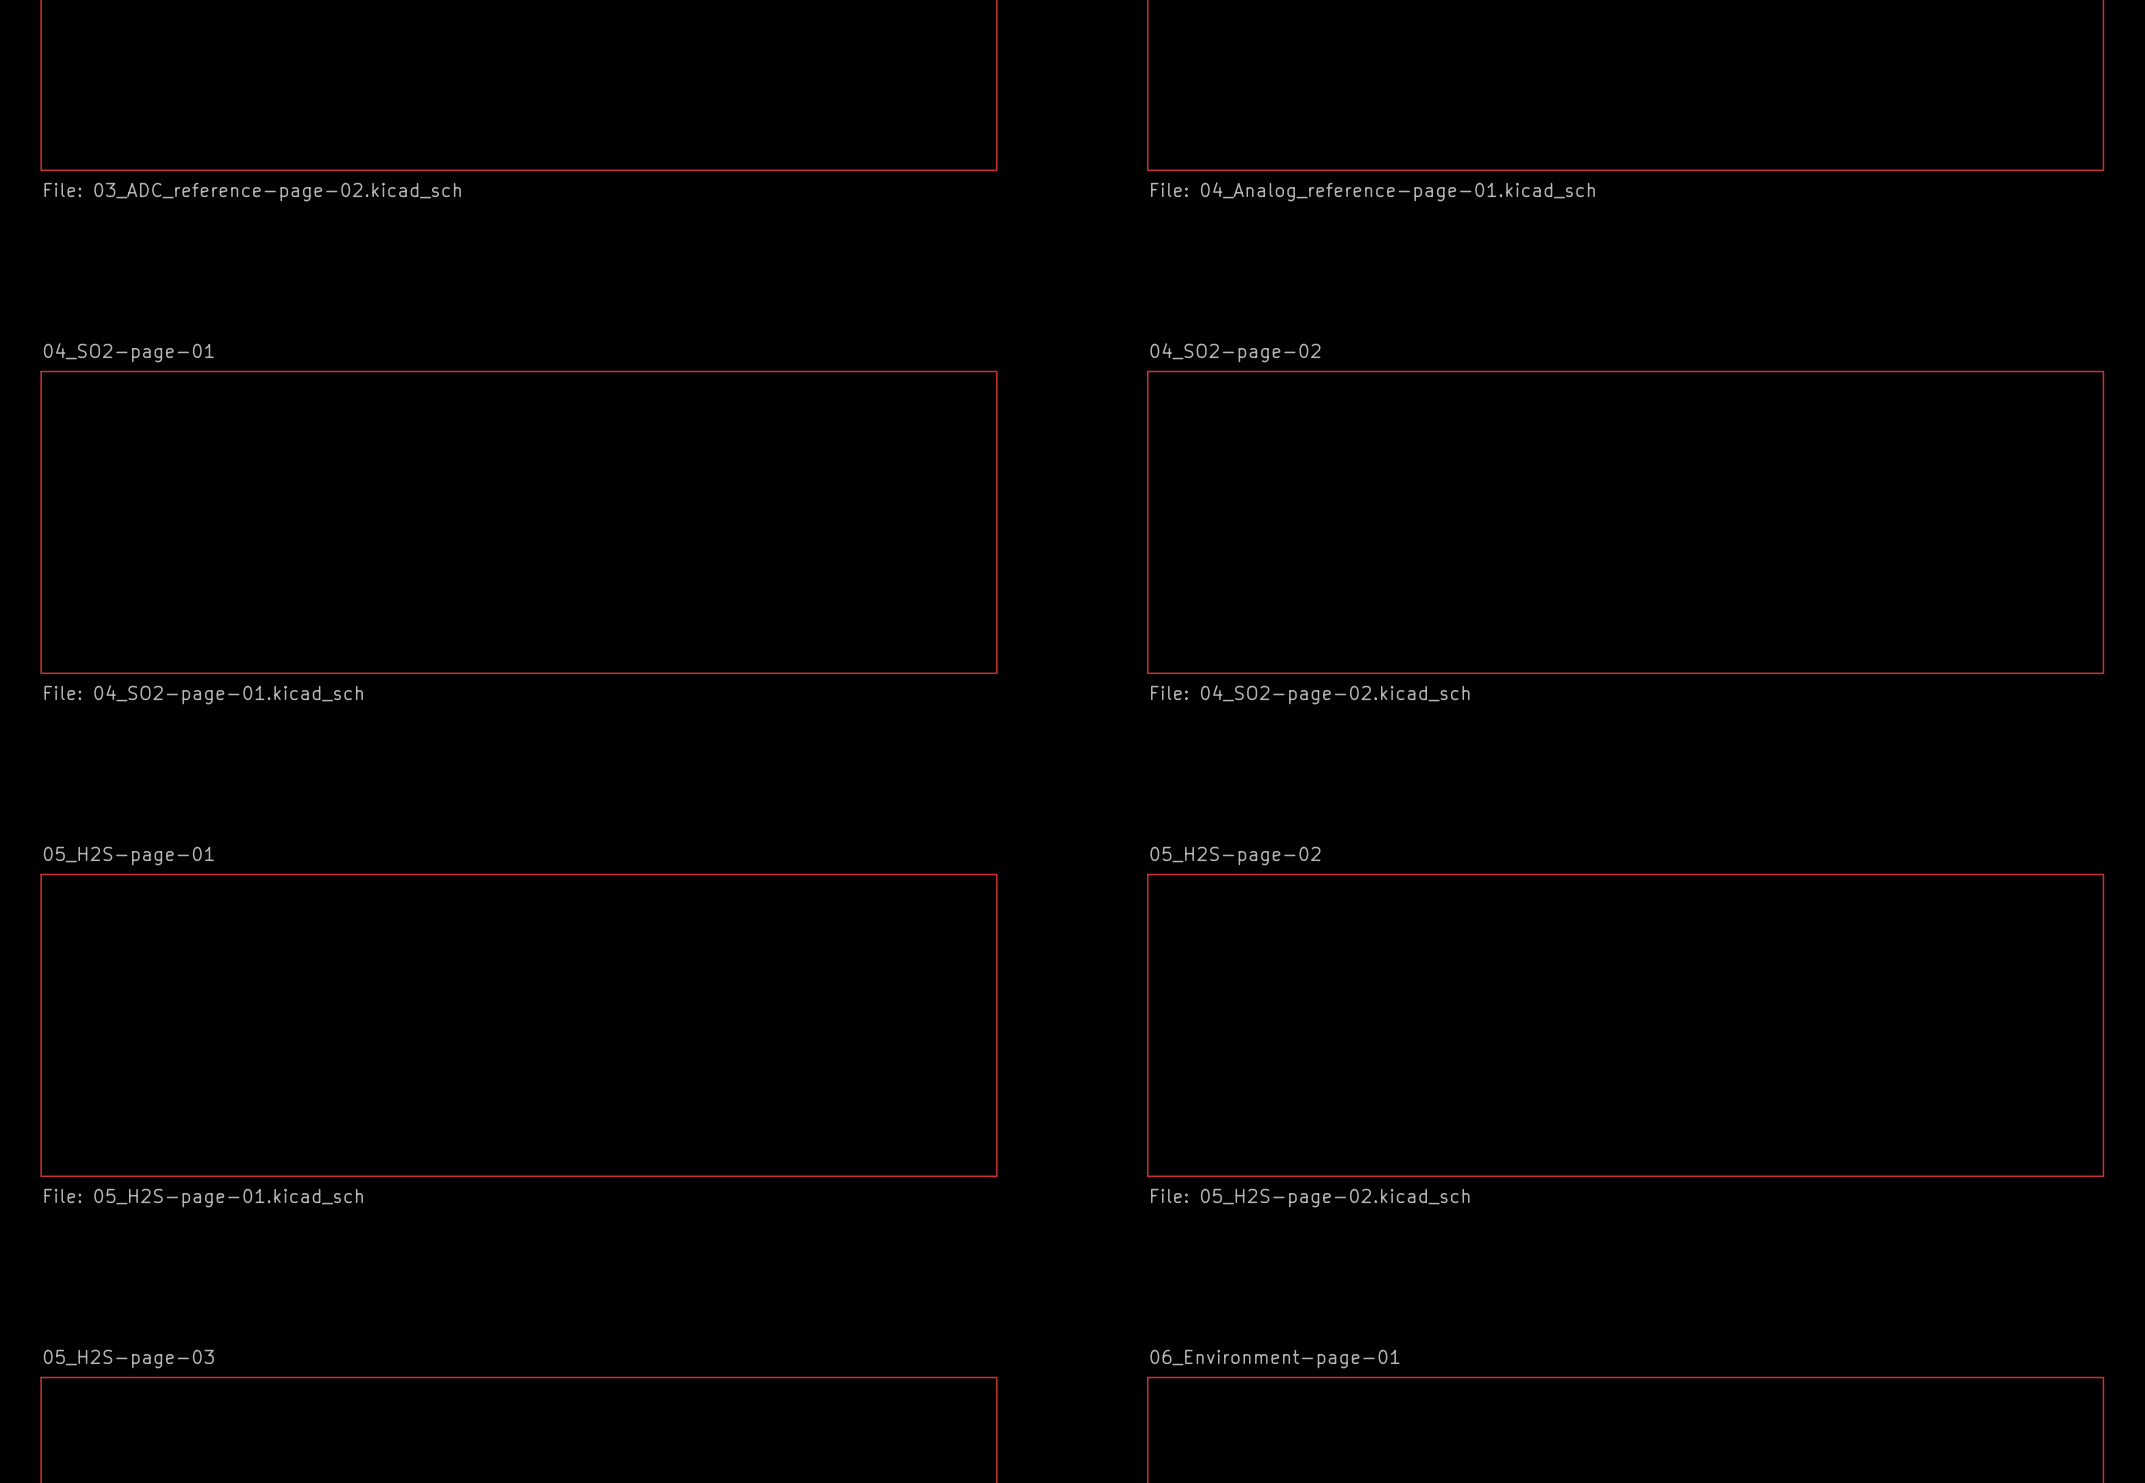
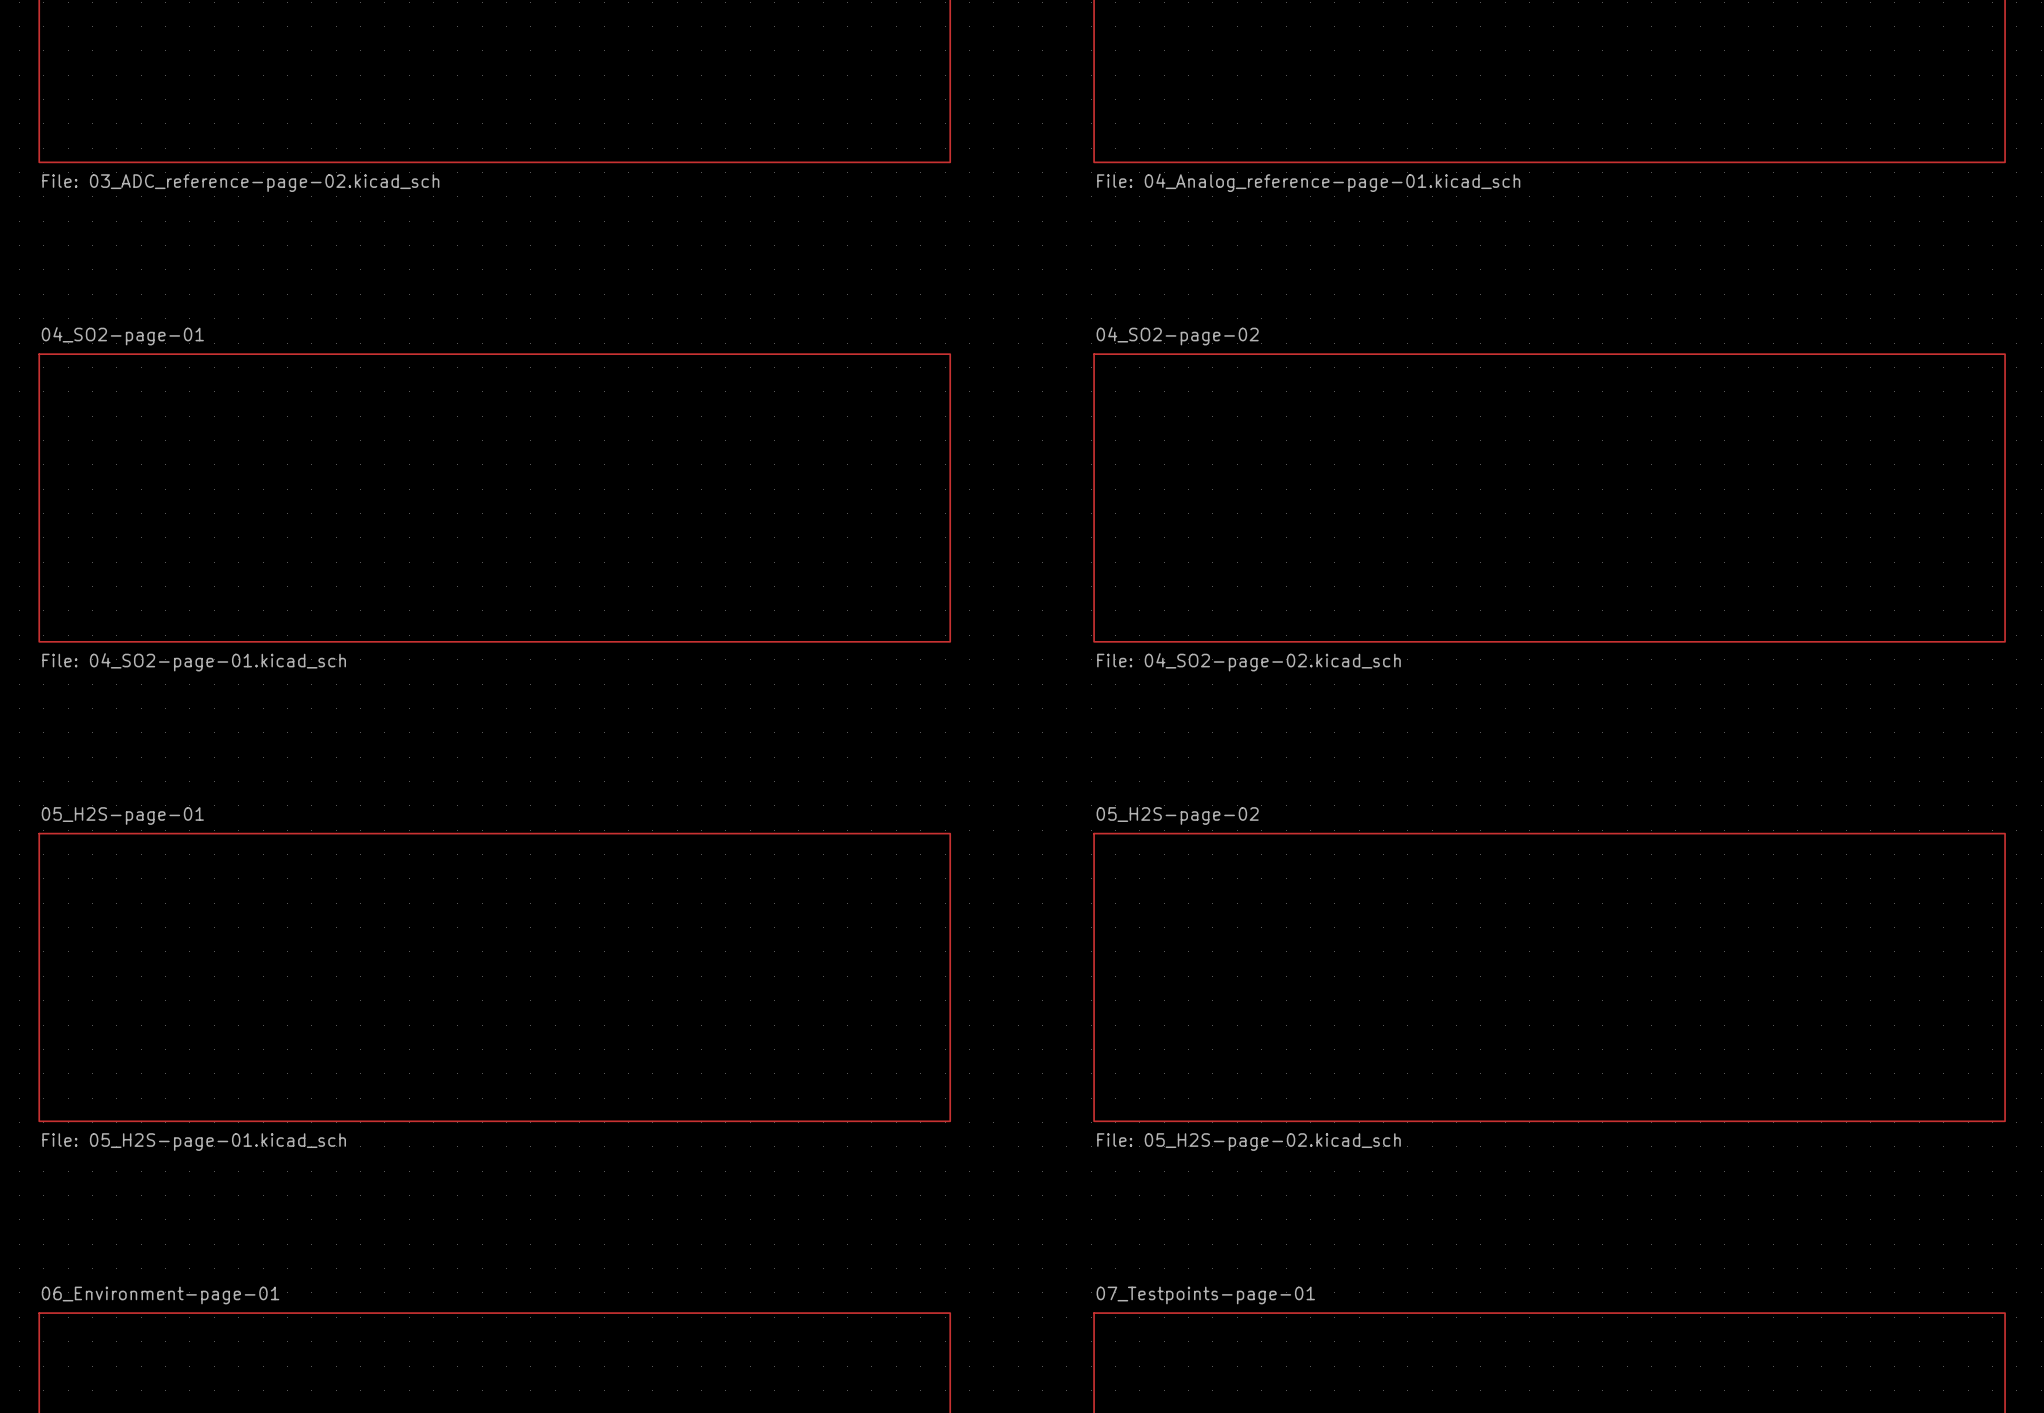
sheet 05_H2S-page-03 name: 05_H2S-page-03 (128, 1359) -> 06_Environment-page-01 (160, 1295)
sheet 06_Environment-page-01 name: 06_Environment-page-01 (1274, 1359) -> 07_Testpoints-page-01 (1205, 1295)

